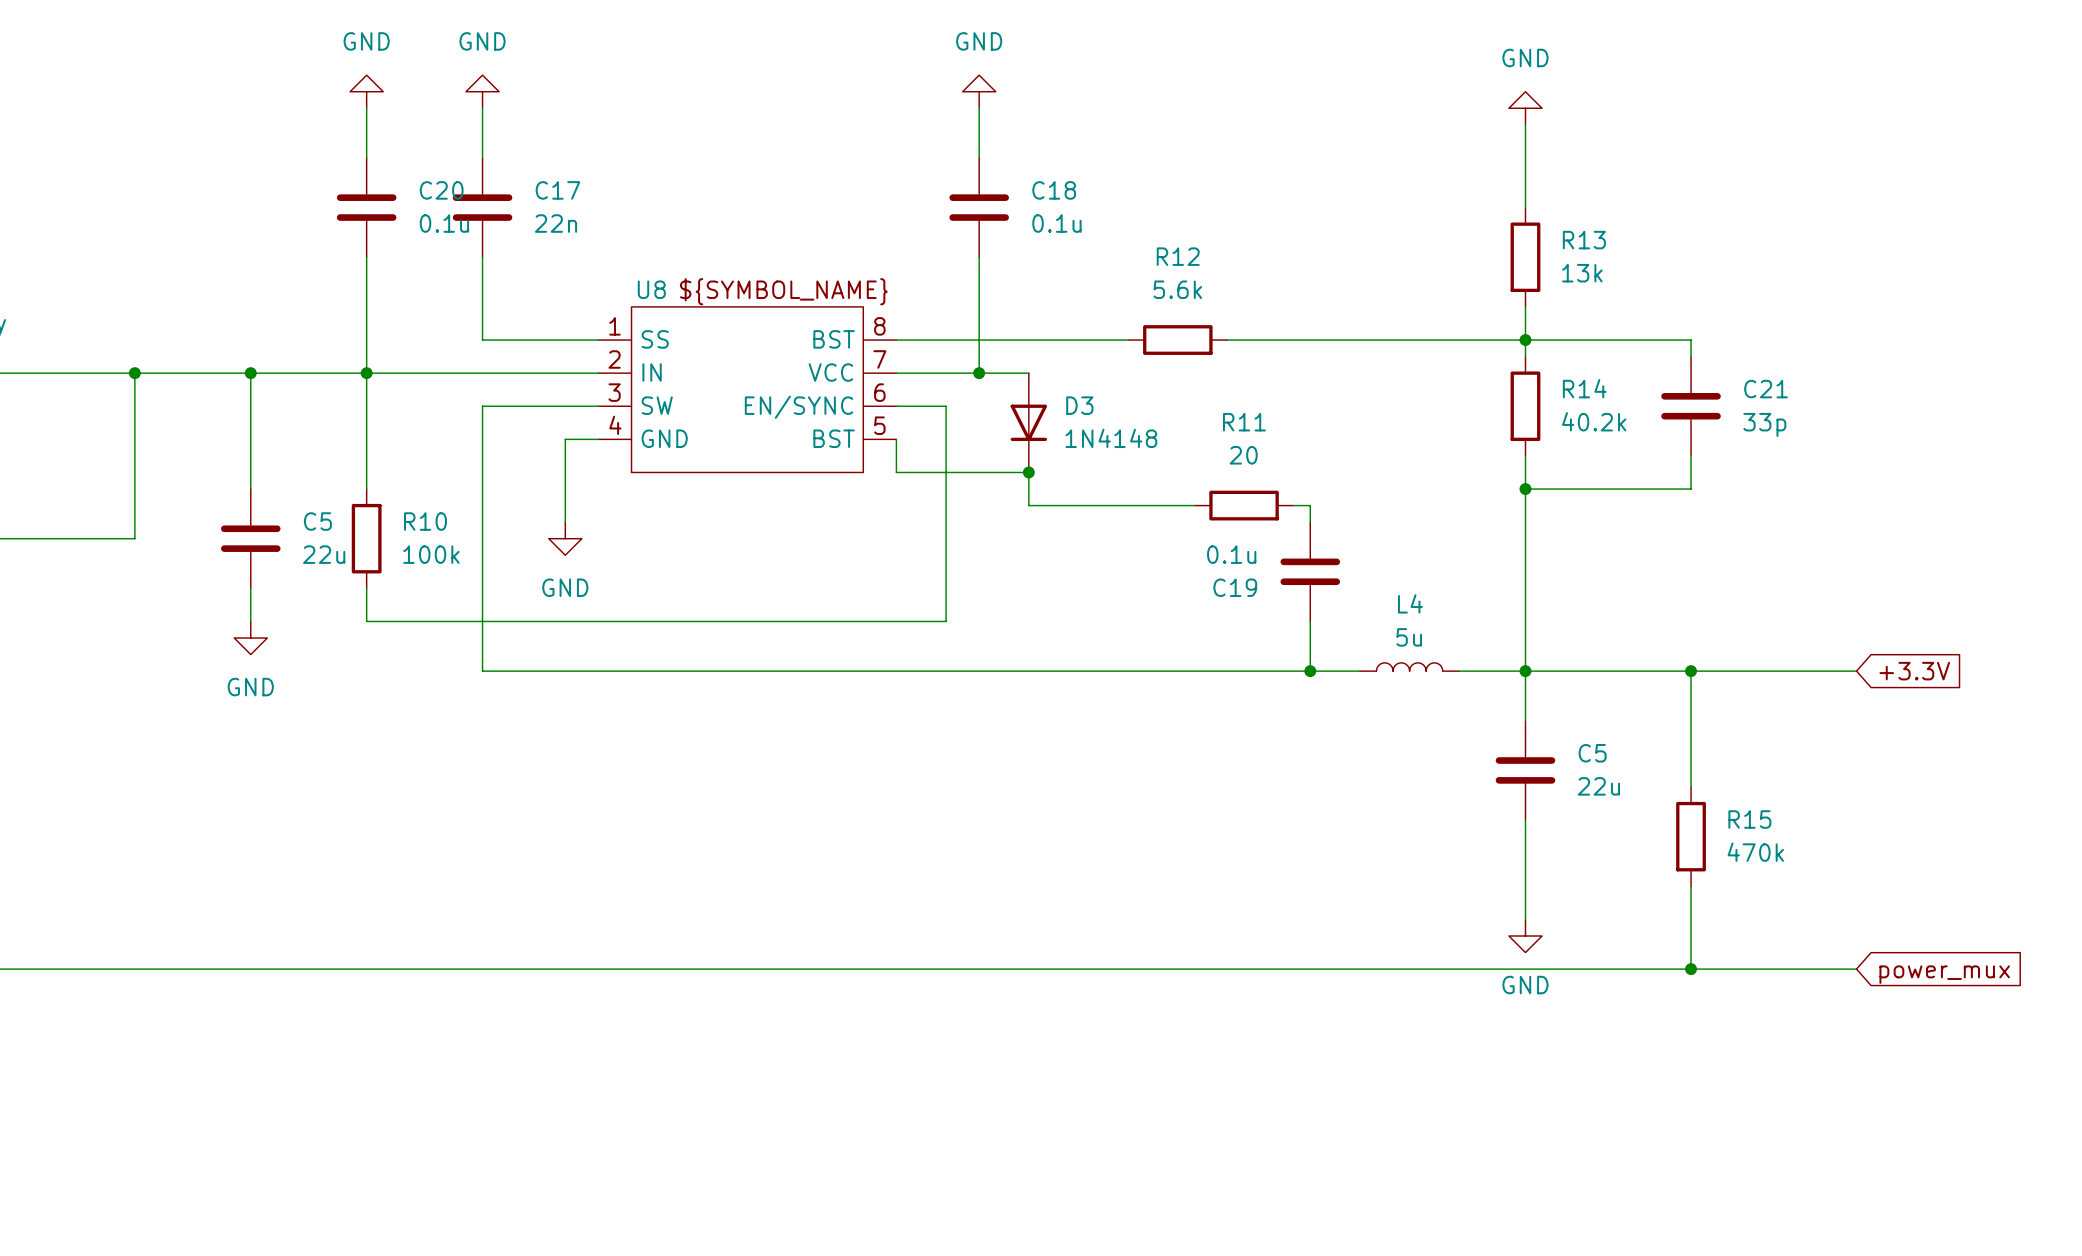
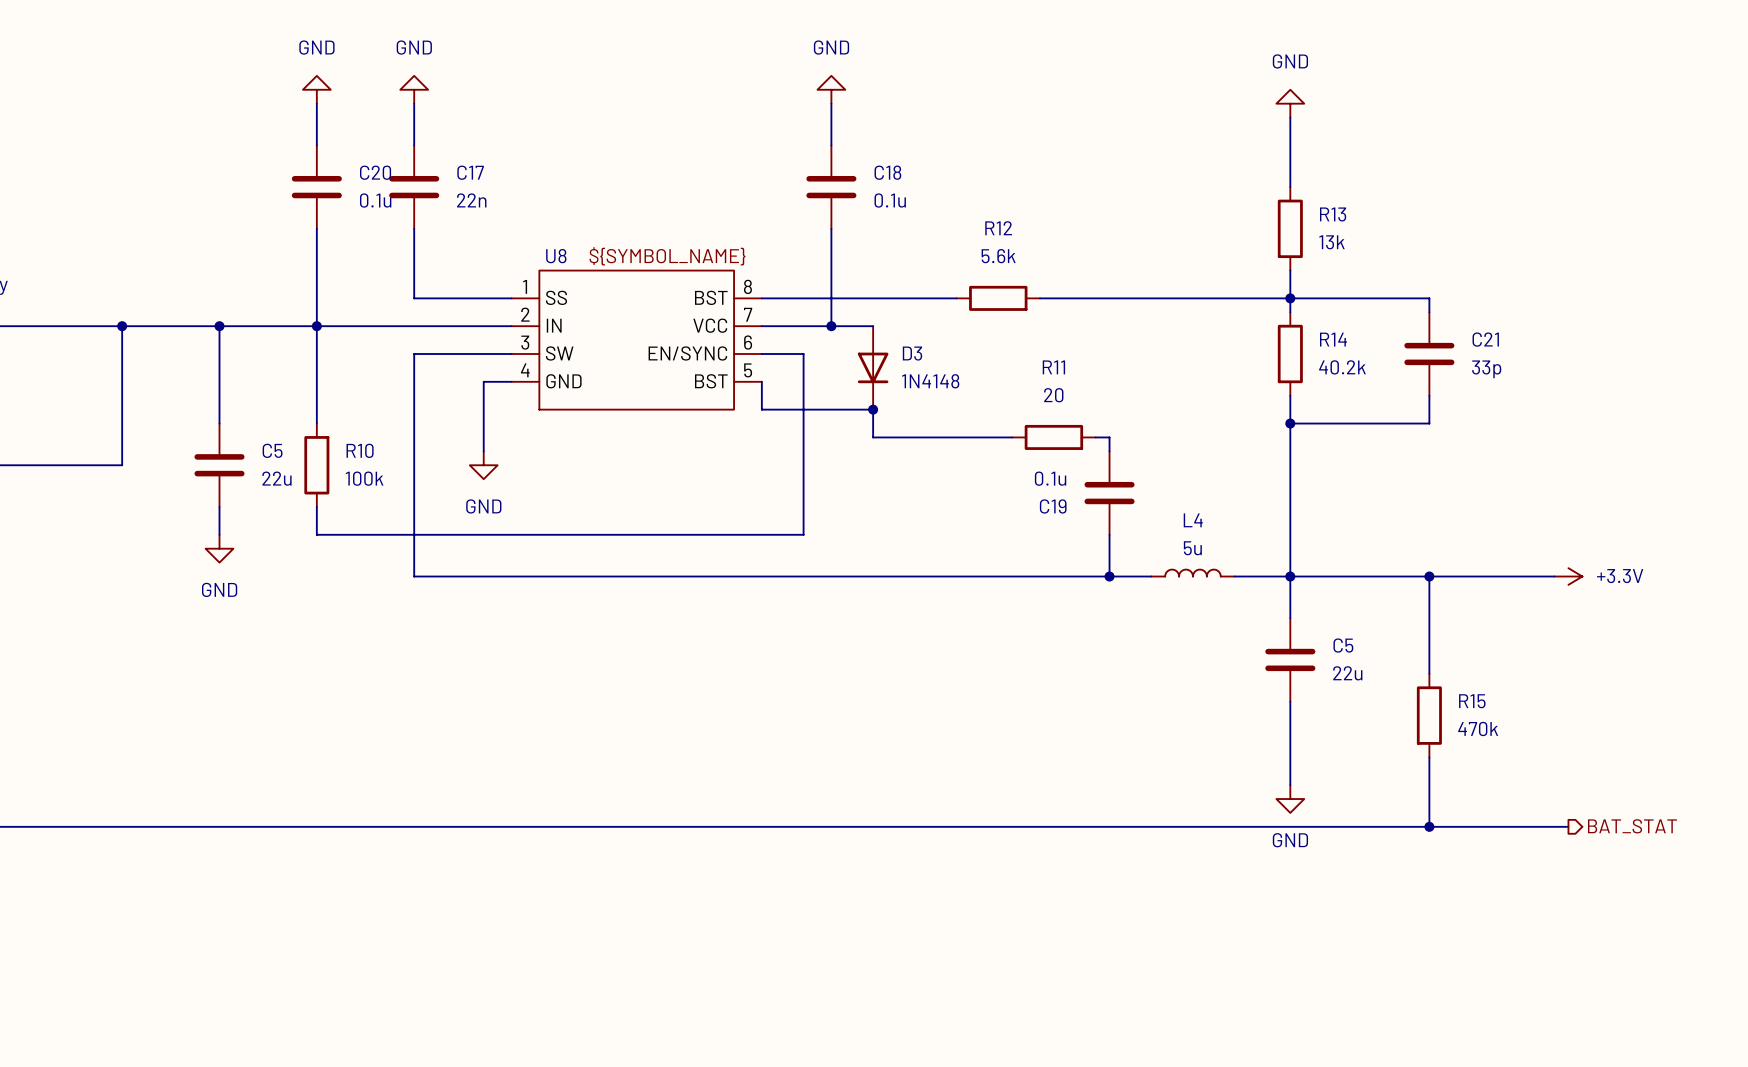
power symbol: none -> +3.3V (1568, 576)
global label: +3.3V (1914, 671) -> none
hierarchical label: none -> BAT_STAT (1632, 826)
global label: power_mux (1944, 974) -> none

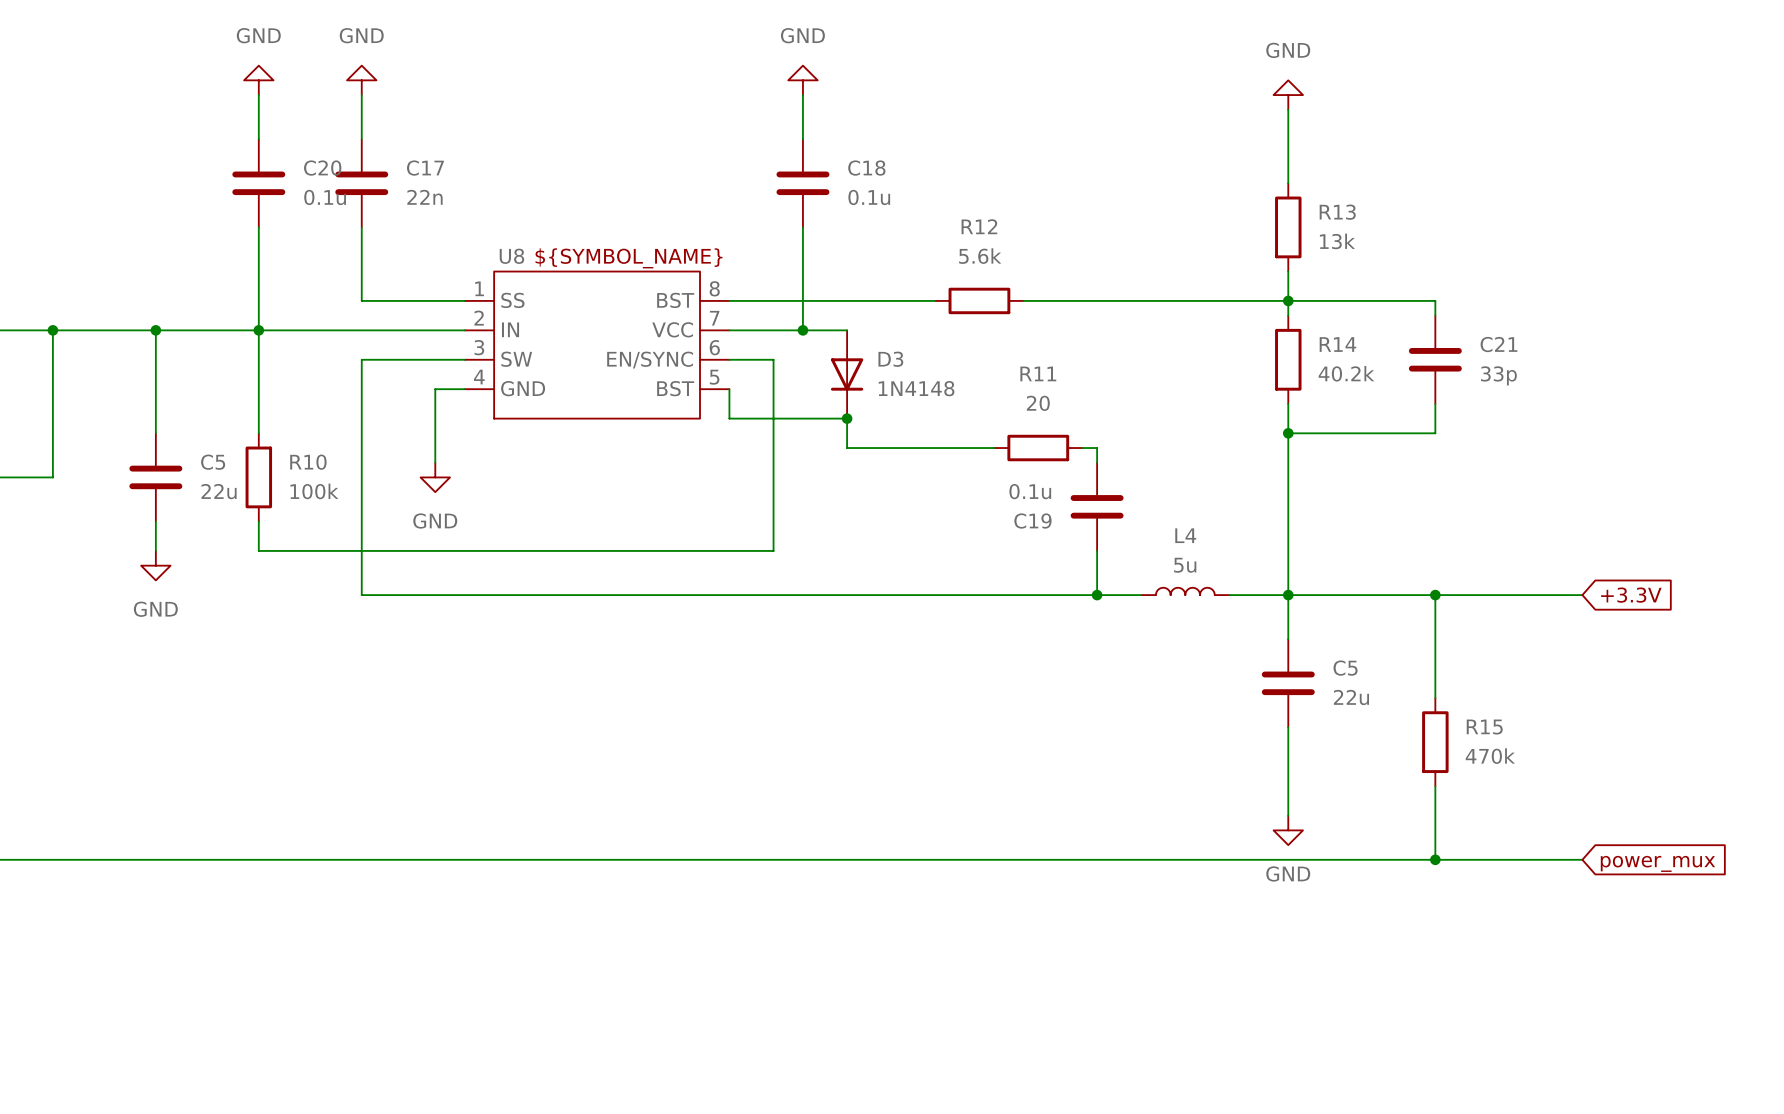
power symbol: +3.3V (1568, 576) -> none
global label: none -> +3.3V (1631, 595)
hierarchical label: BAT_STAT (1632, 826) -> none
global label: none -> power_mux (1657, 863)

